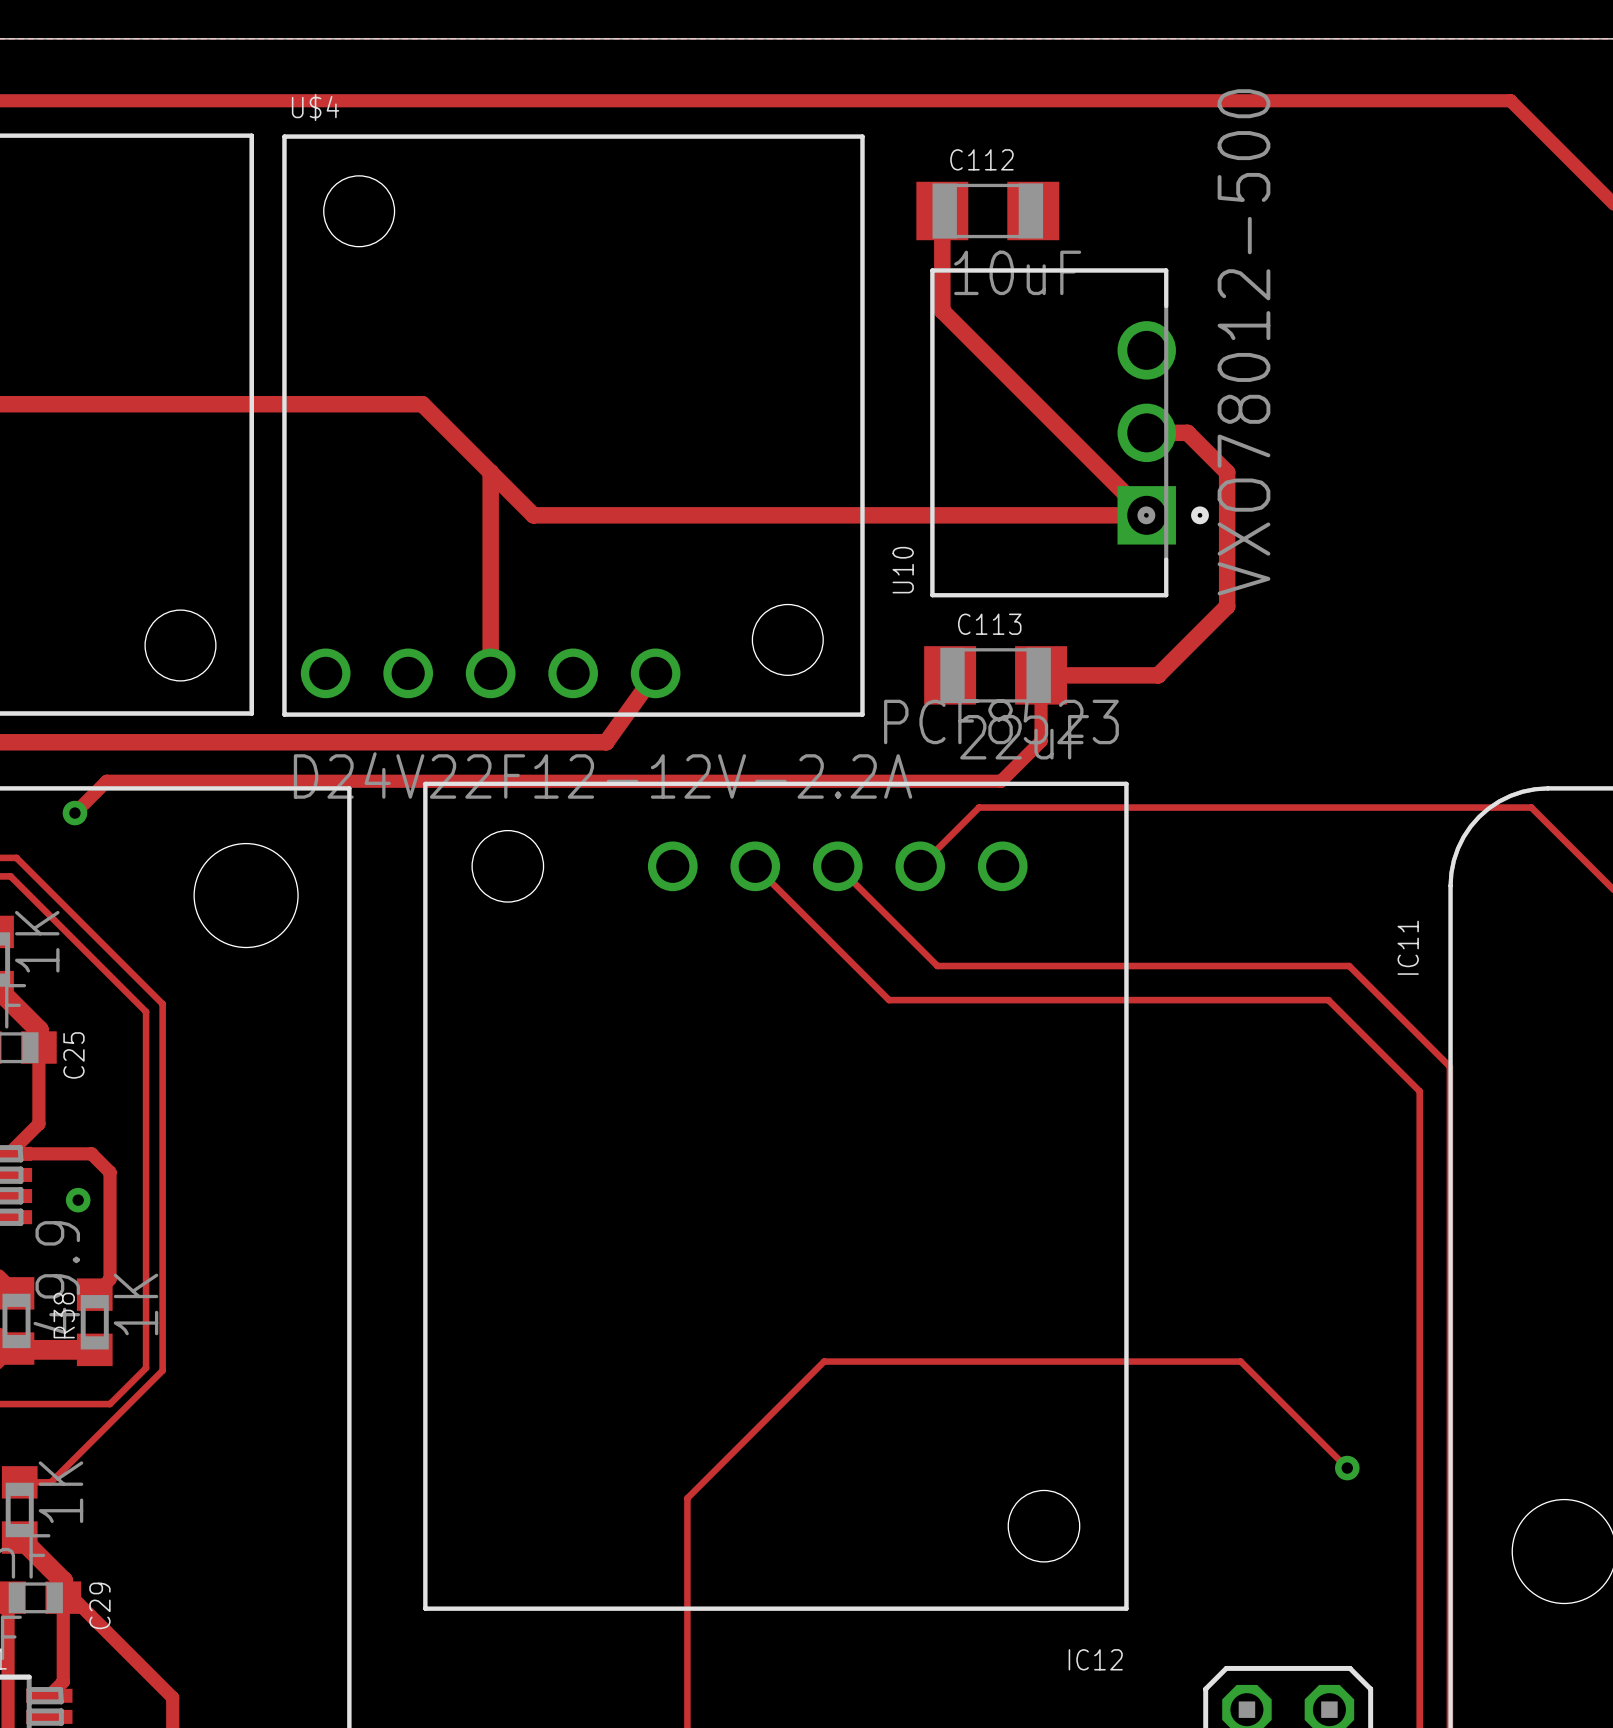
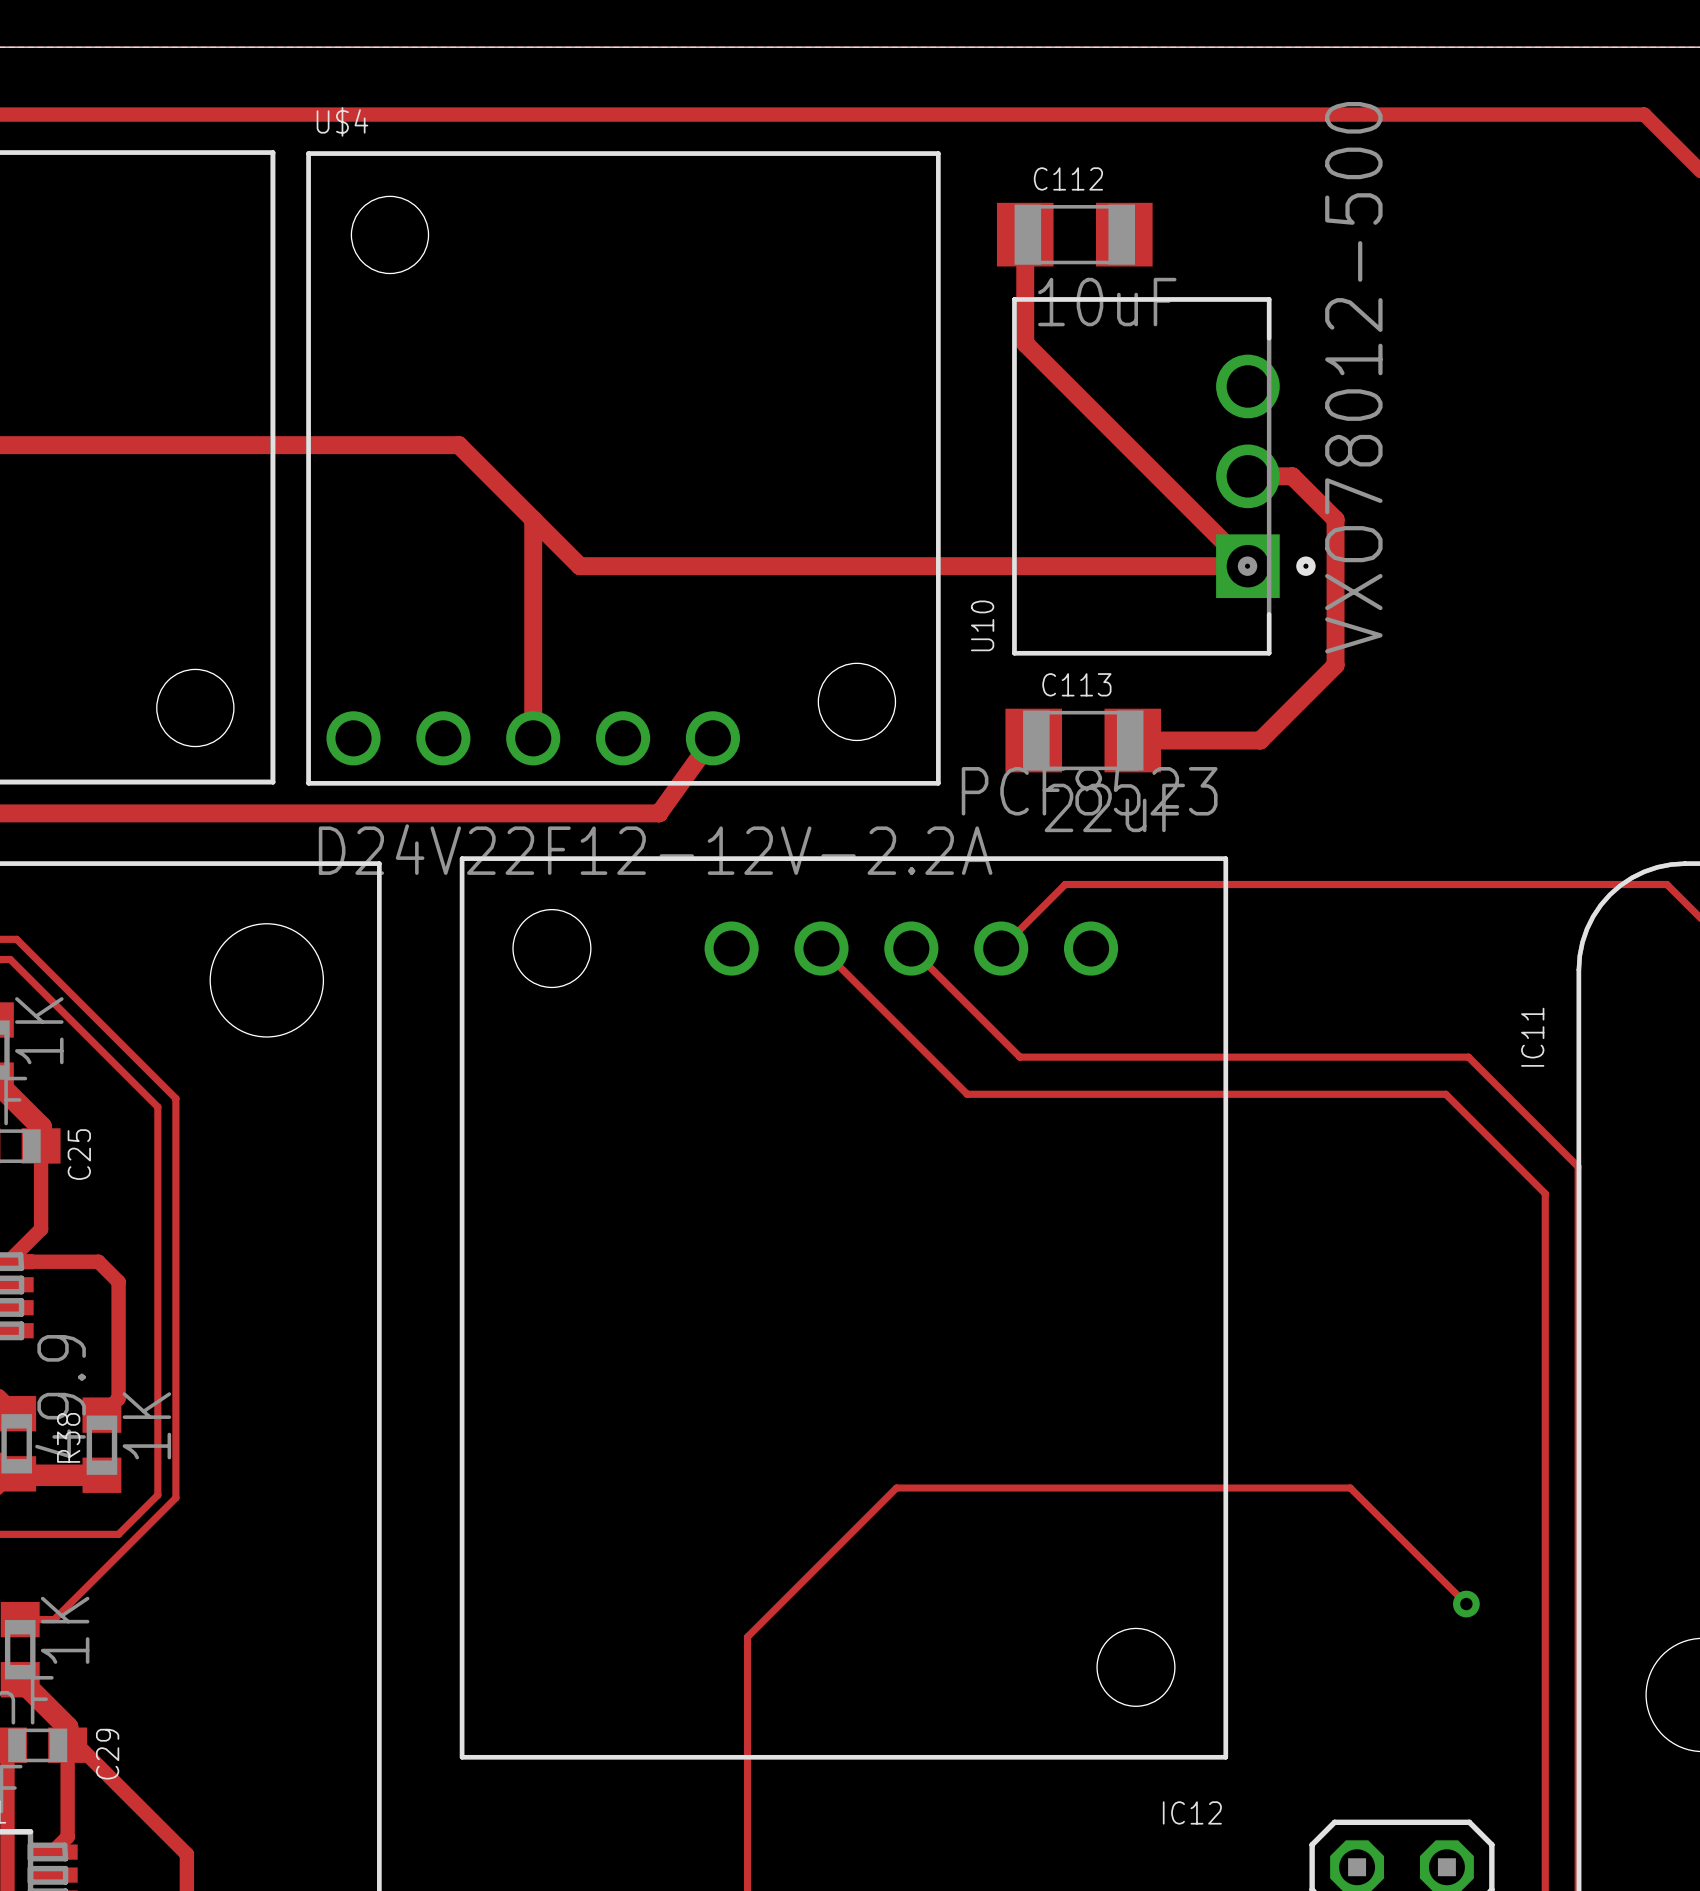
track: (1041, 675) (1041, 741) (1001, 781) (106, 781) (74, 813) -> none
via: (74, 813) -> none
via: (78, 1200) -> none

